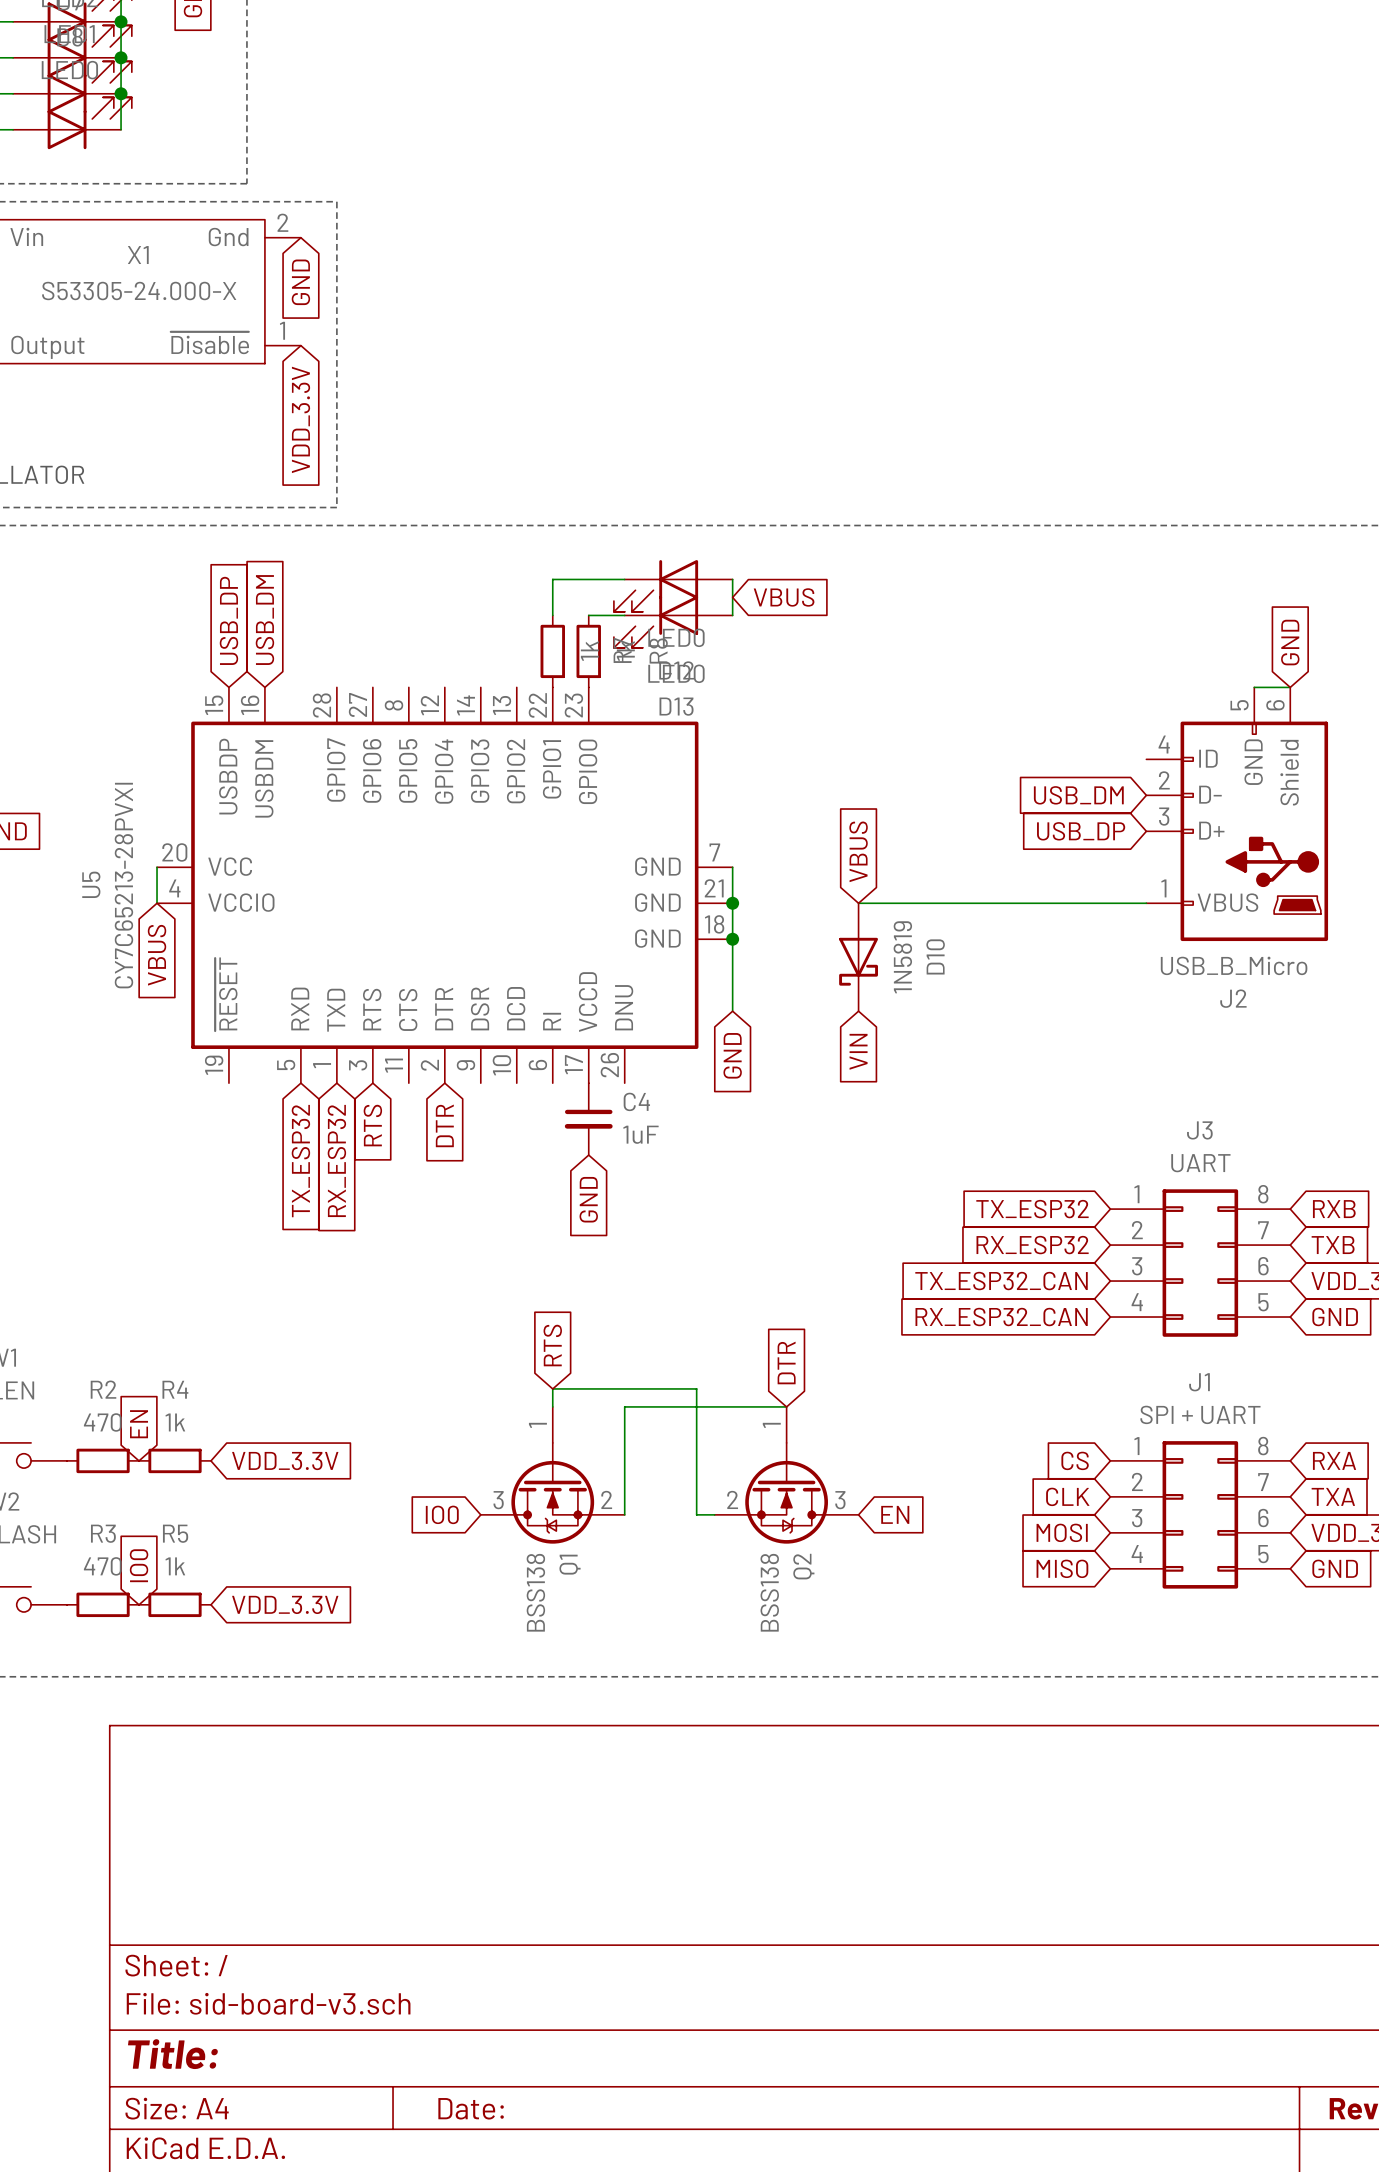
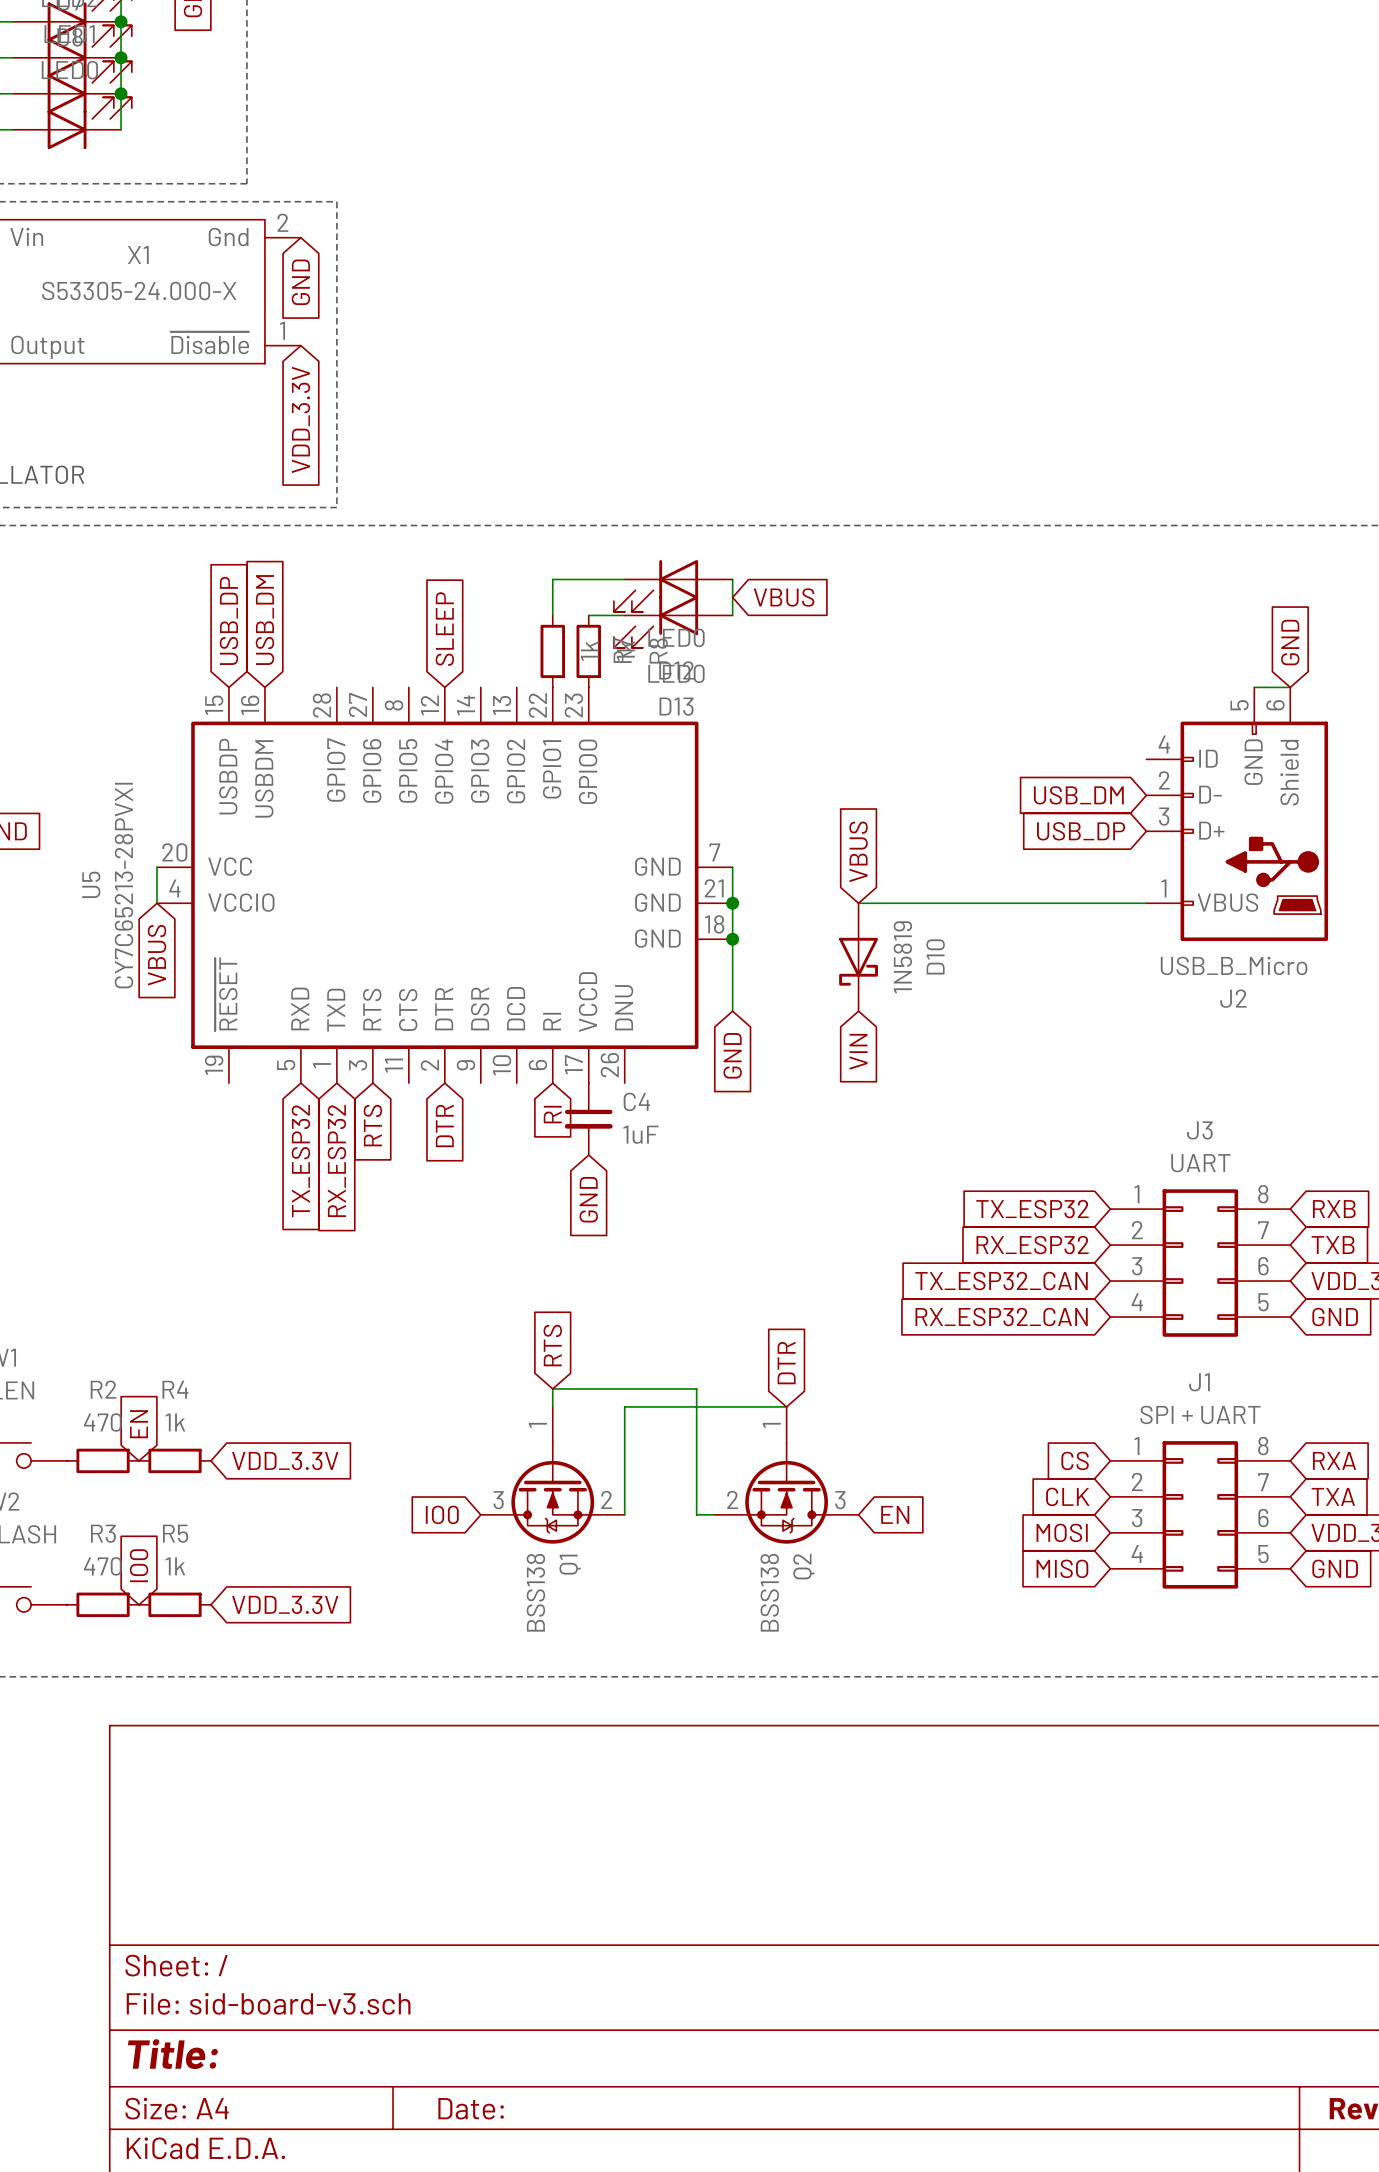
global label: none -> SLEEP (444, 629)
global label: none -> RI (552, 1114)

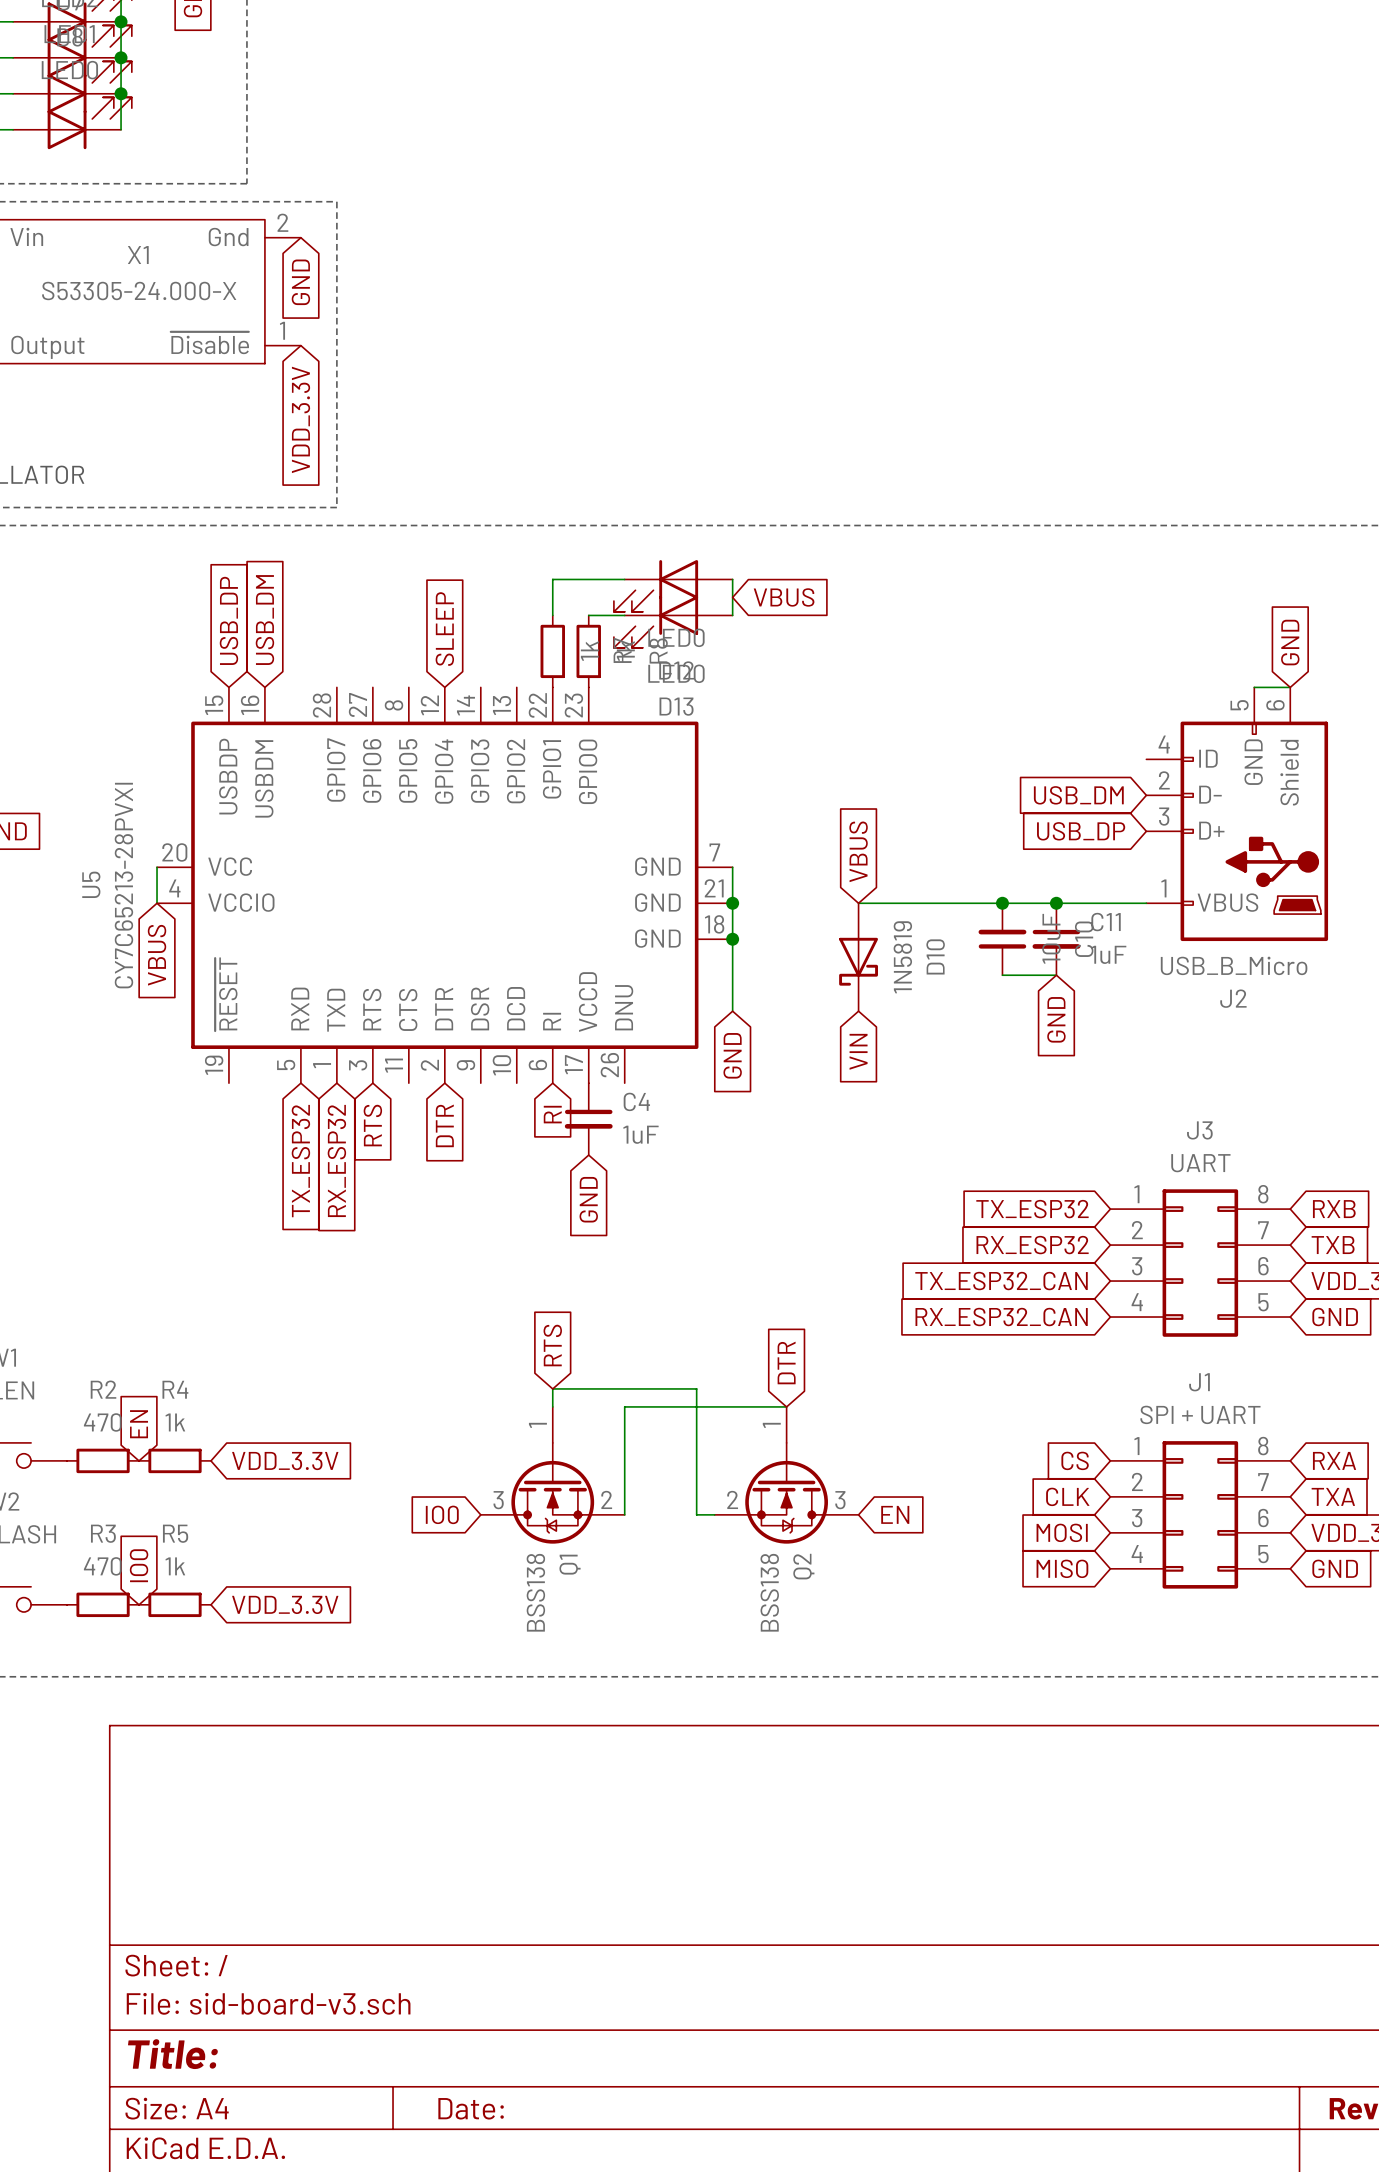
junction: none -> (1002, 903)
junction: none -> (1056, 903)
C10: none -> 10uF (1002, 939)
C11: none -> 1uF (1056, 939)
wire: none -> (1002, 975) (1056, 975)
global label: none -> GND (1056, 1019)

